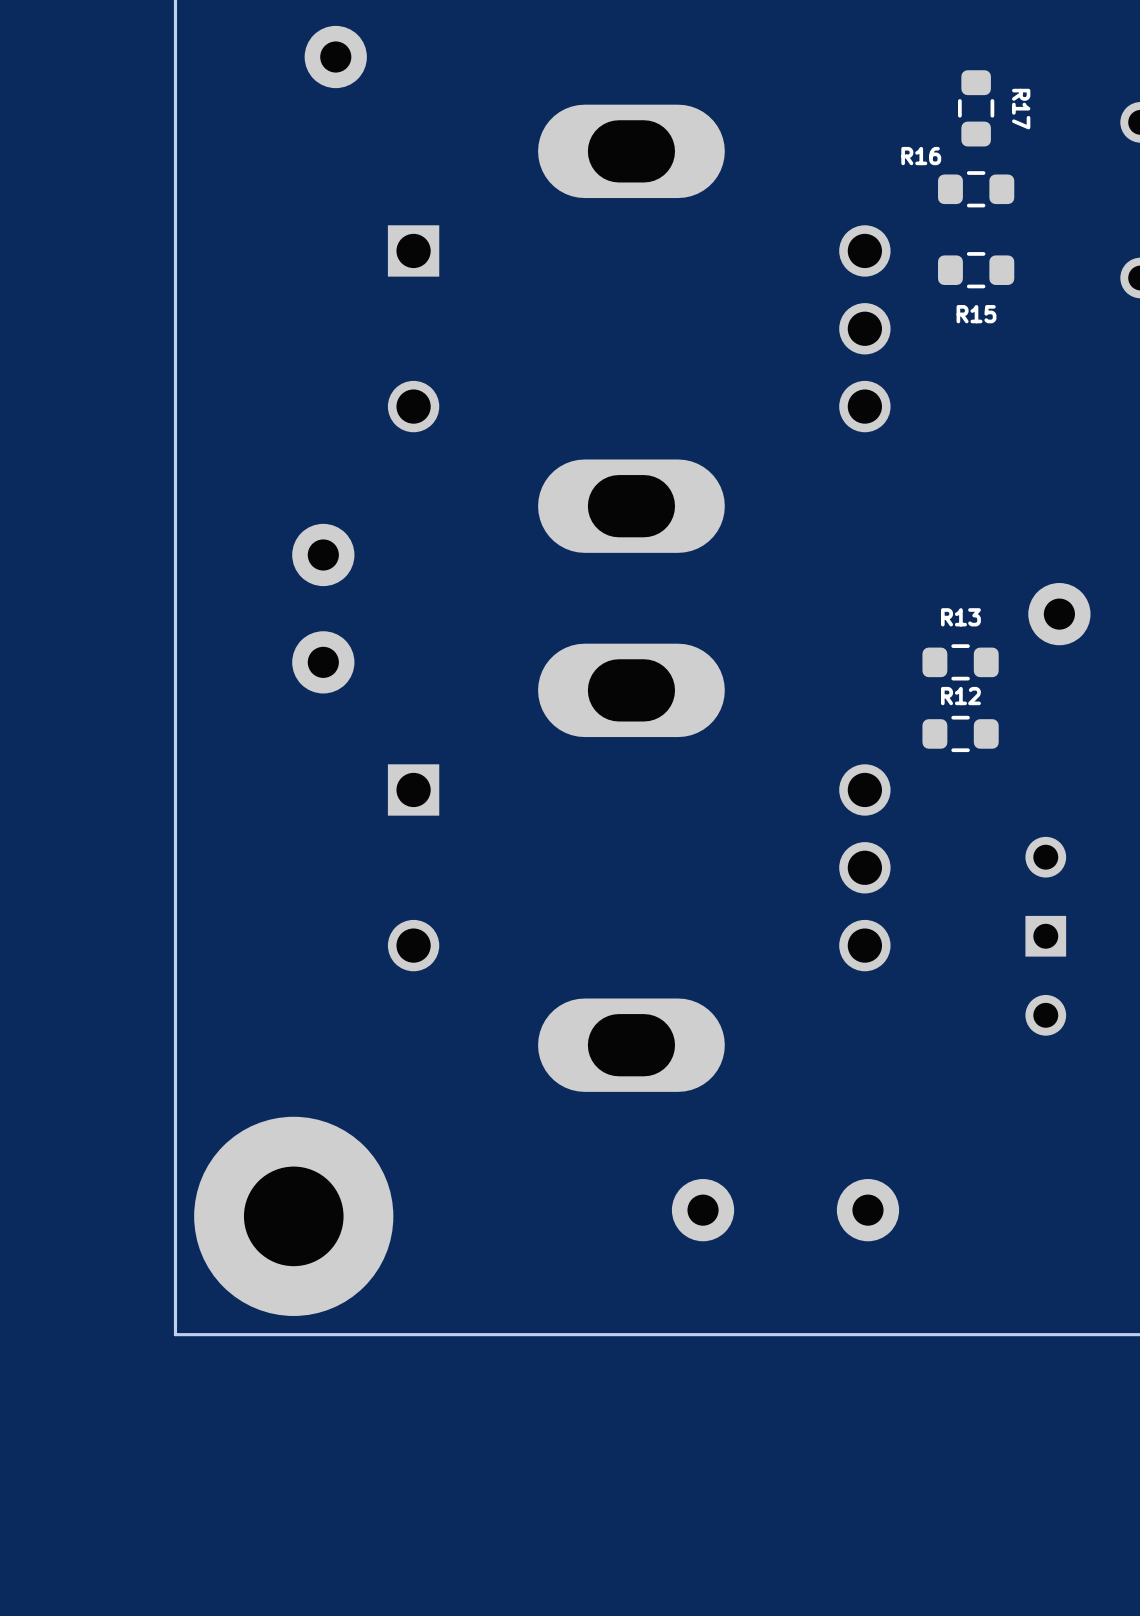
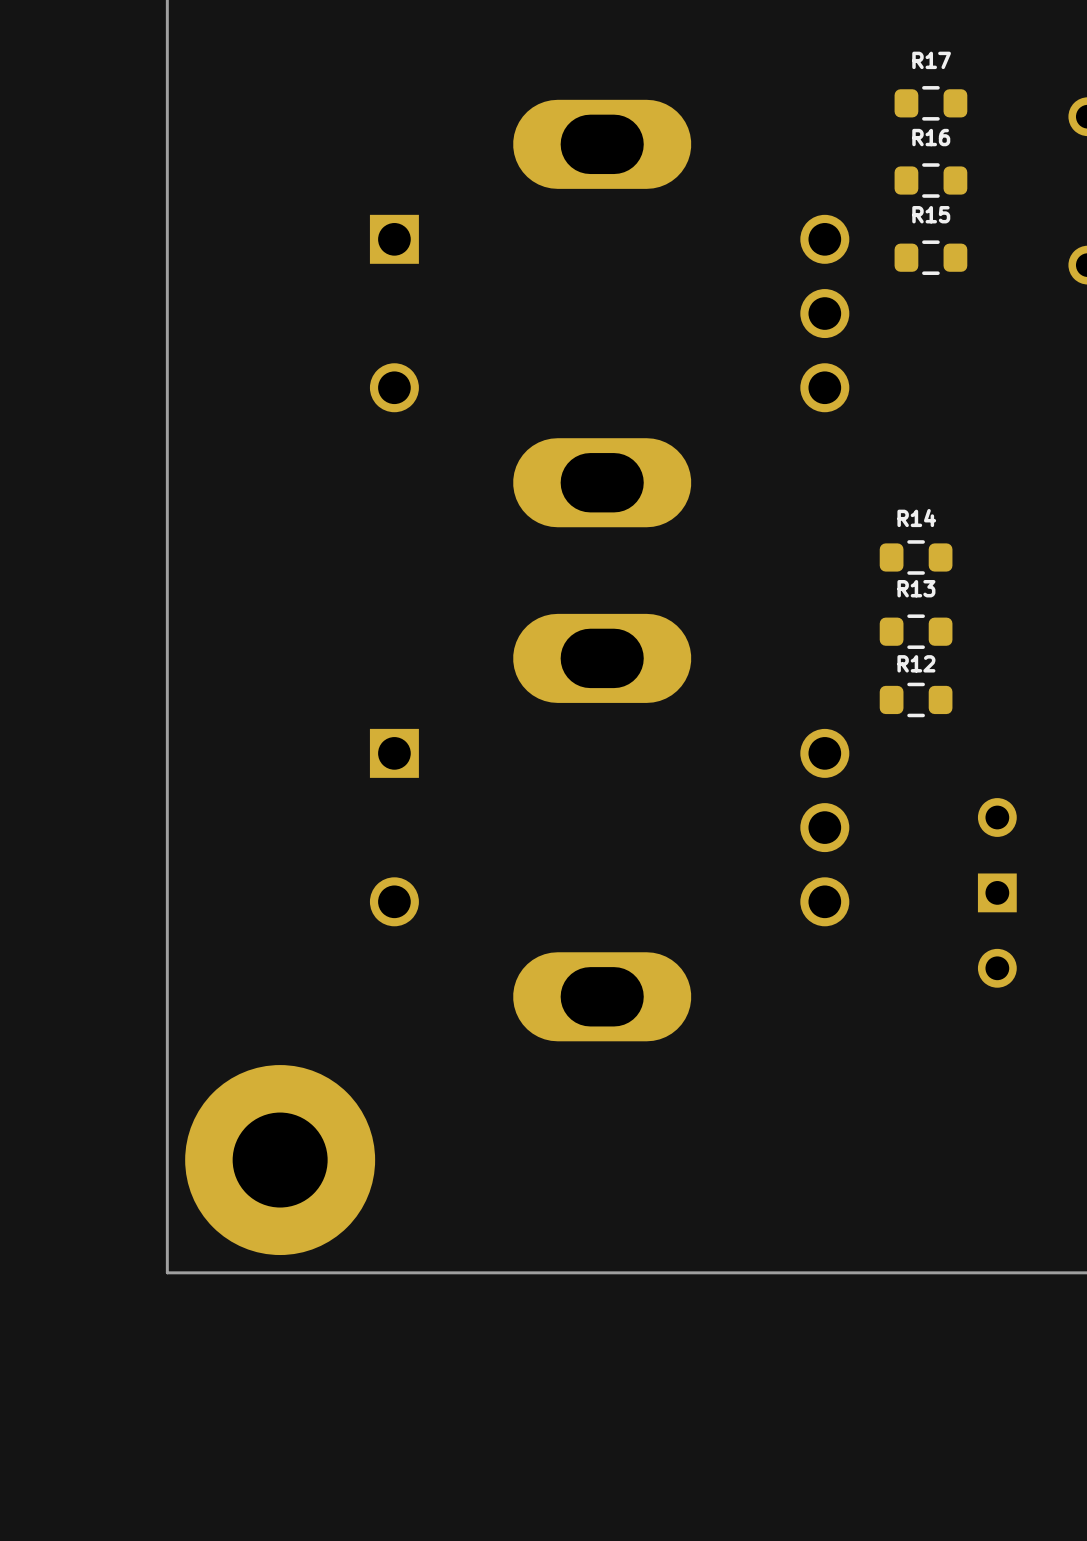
part: (335, 57) -> none
R17 rotation: 0° (976, 108) -> 90° clockwise (930, 103)
R17 name position: R17 (1021, 109) -> R17 (931, 60)
R16 name position: R16 (921, 156) -> R16 (931, 137)
R15 name position: R15 (976, 314) -> R15 (931, 214)
part: (323, 554) -> none
R14: none -> (916, 557)
part: (1059, 614) -> none
part: (323, 662) -> none
part: (703, 1210) -> none
part: (867, 1210) -> none

